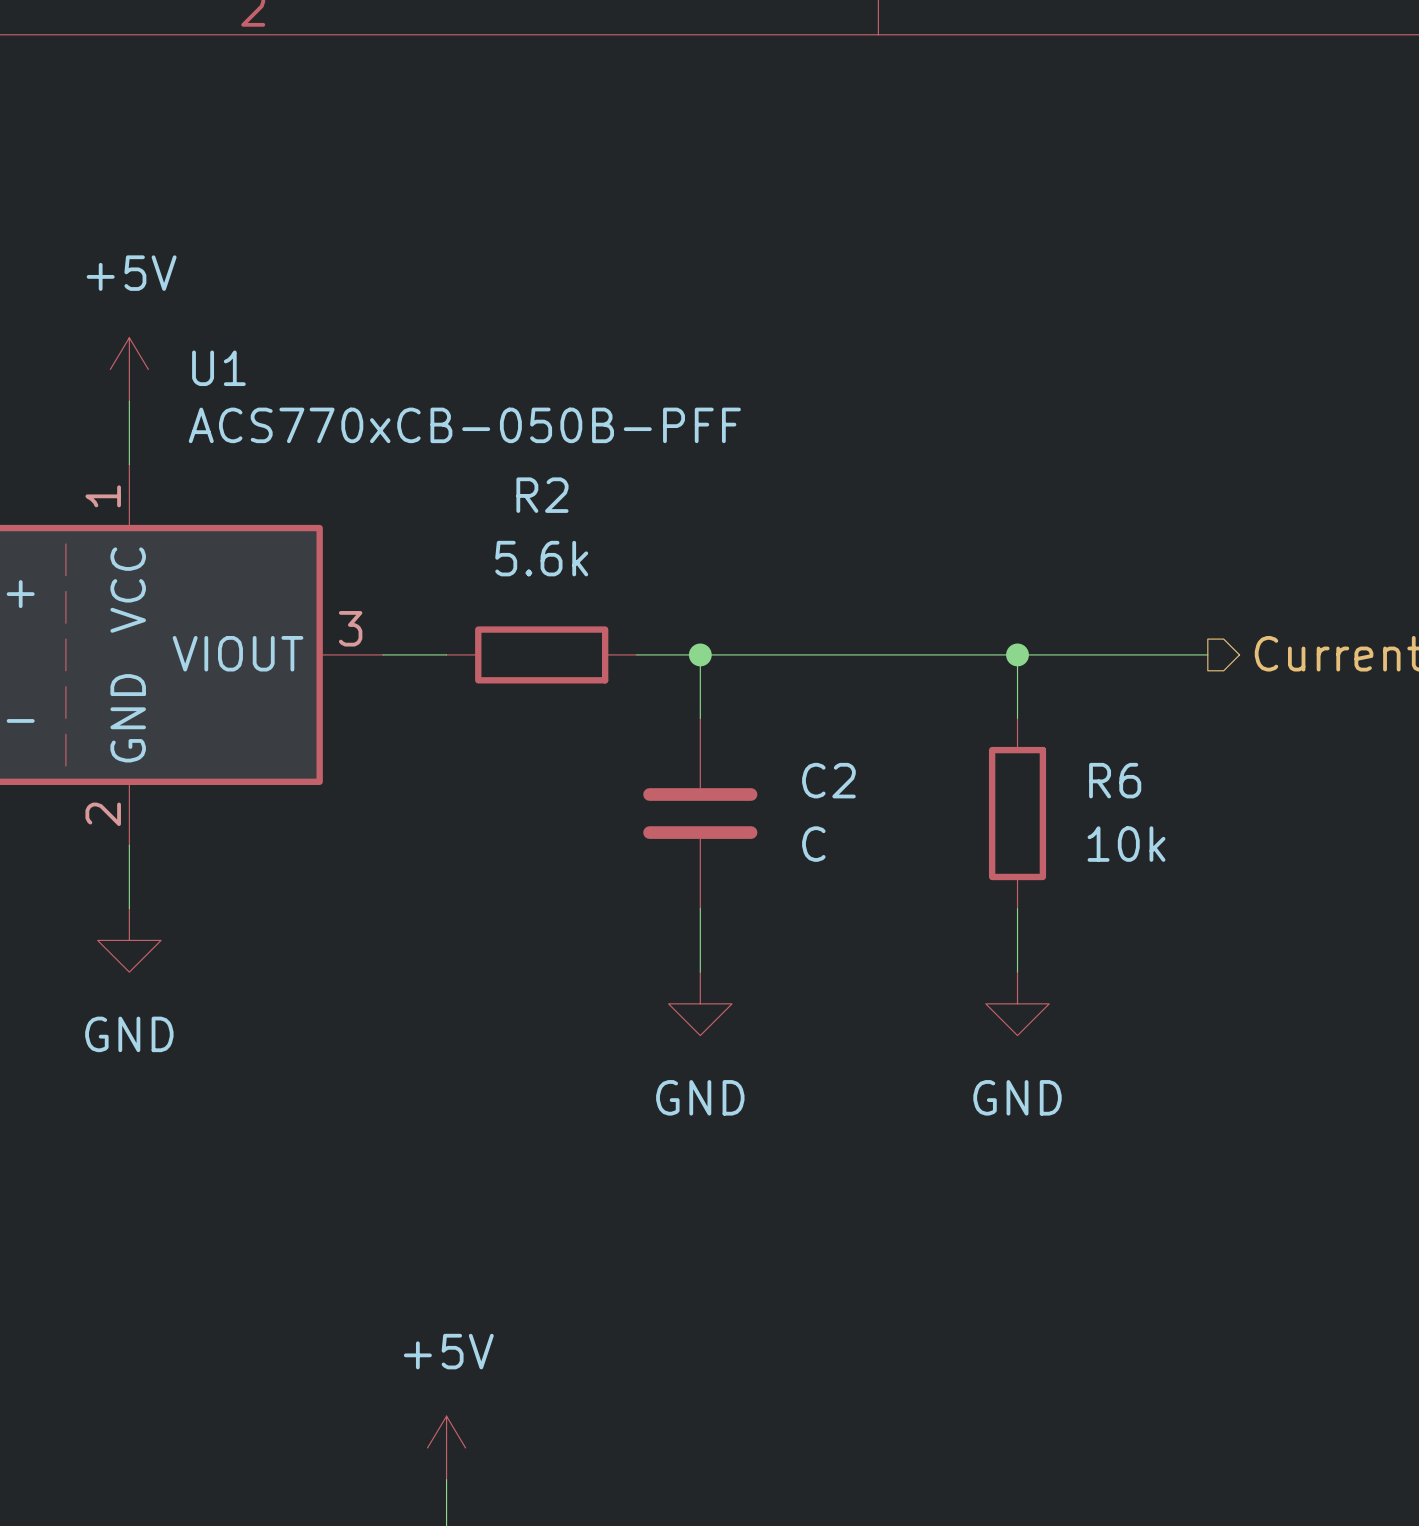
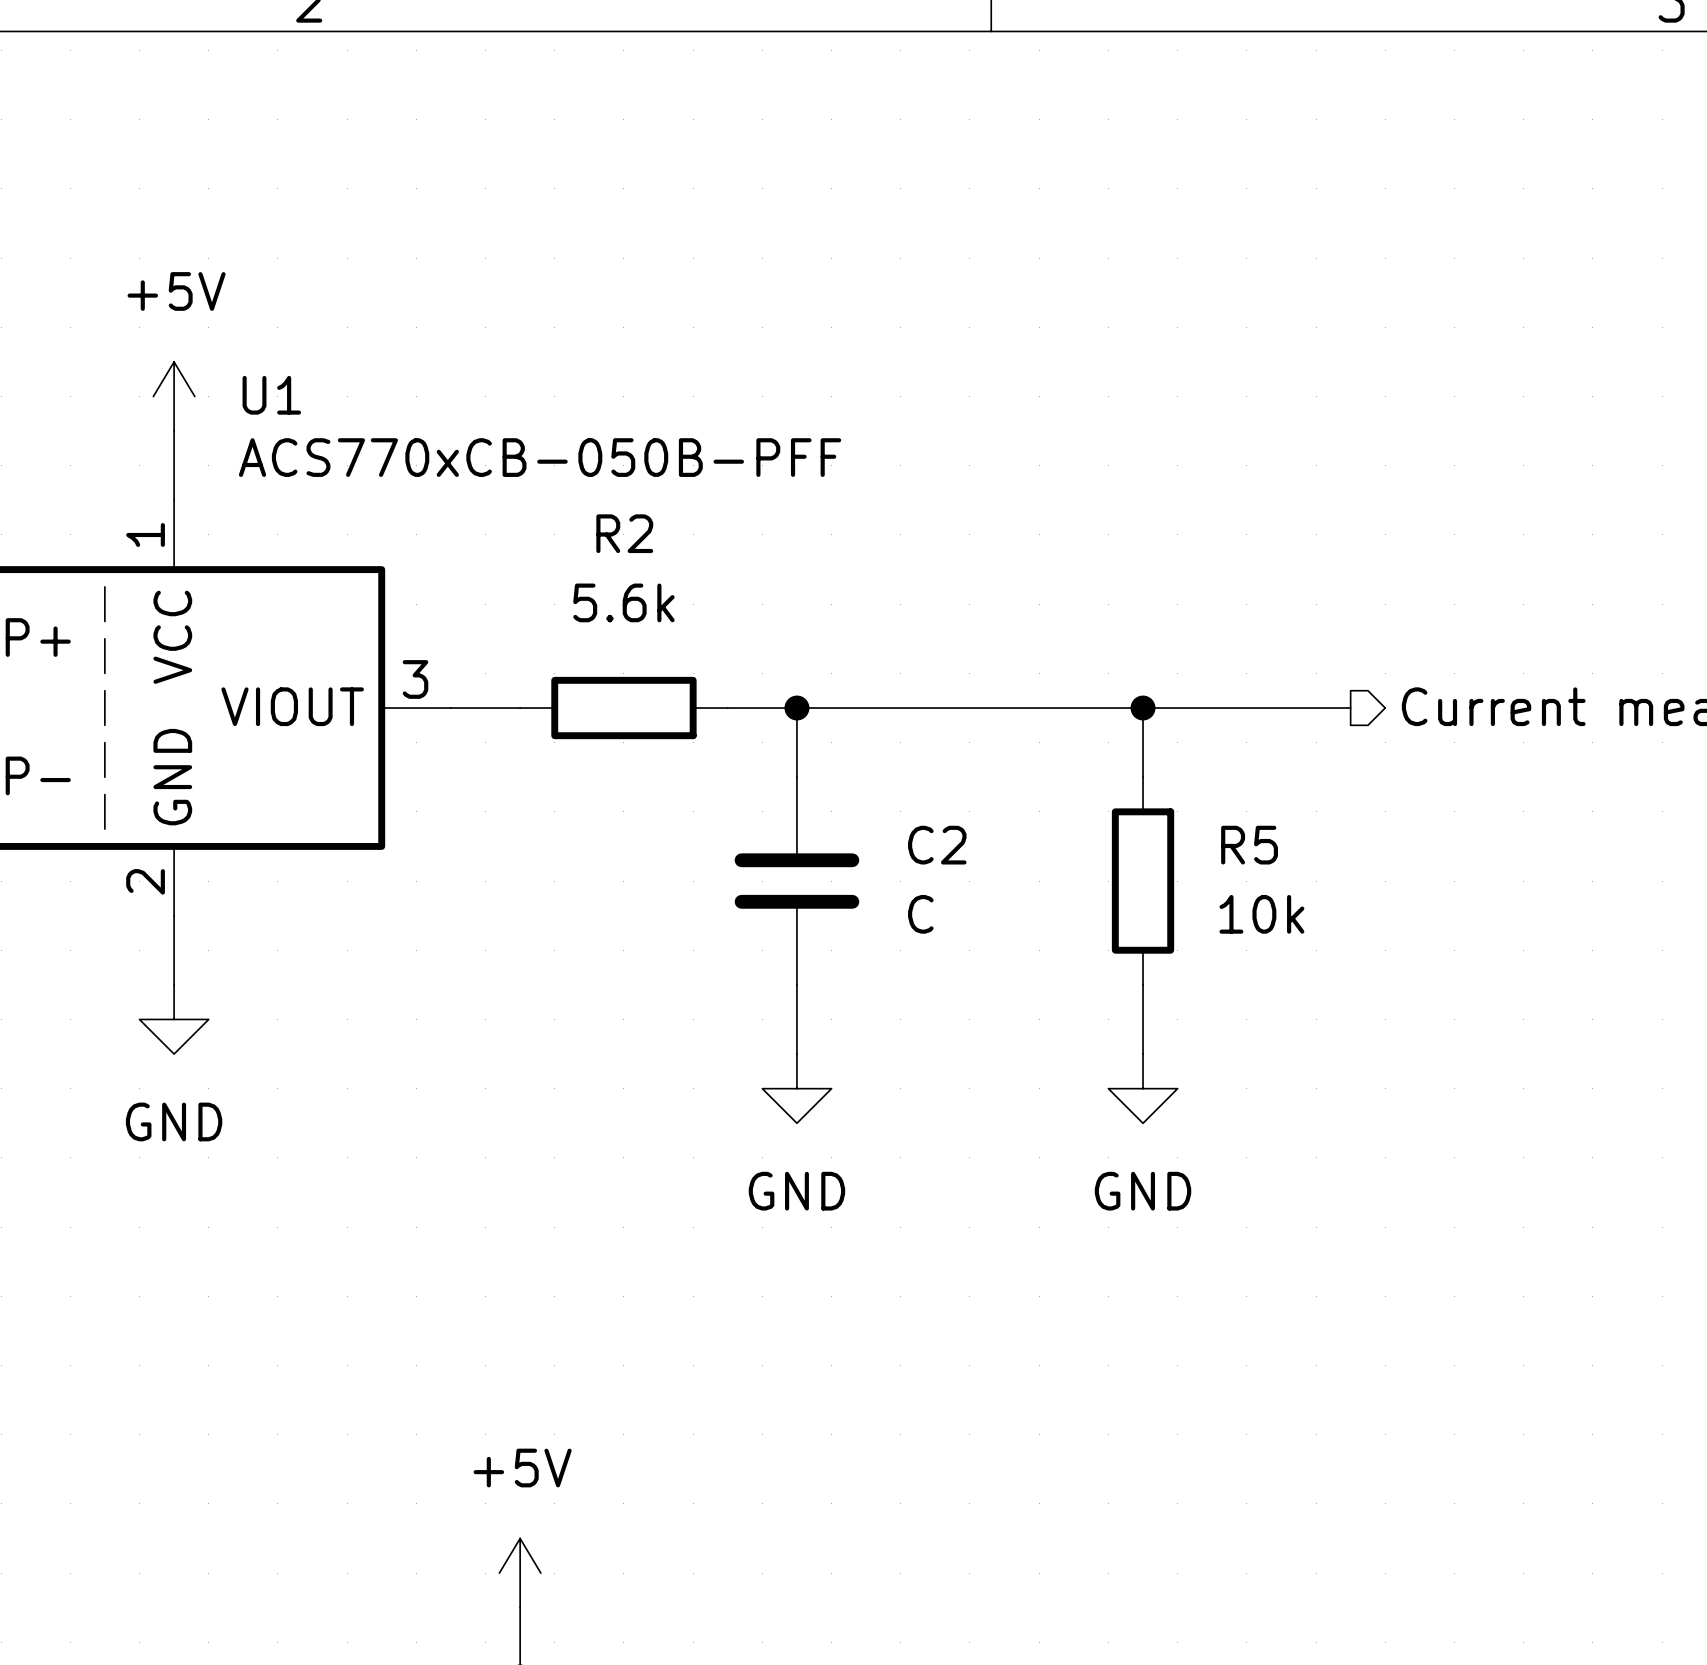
R6 name: R6 (1115, 780) -> R5 (1249, 845)

